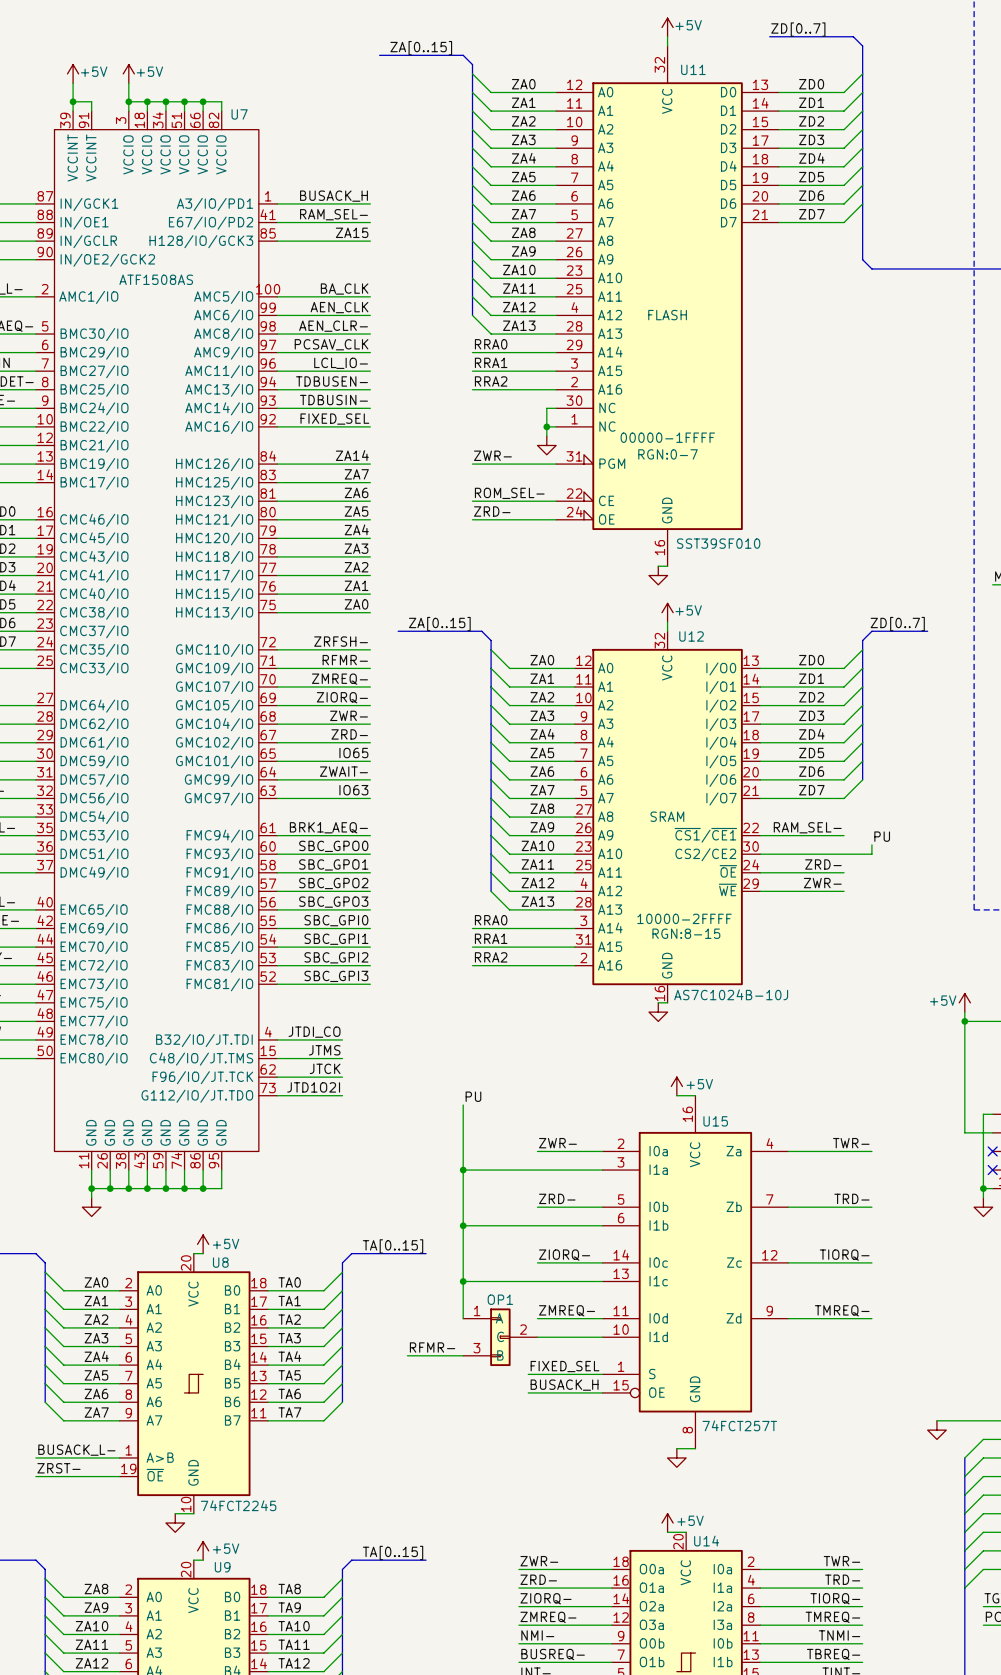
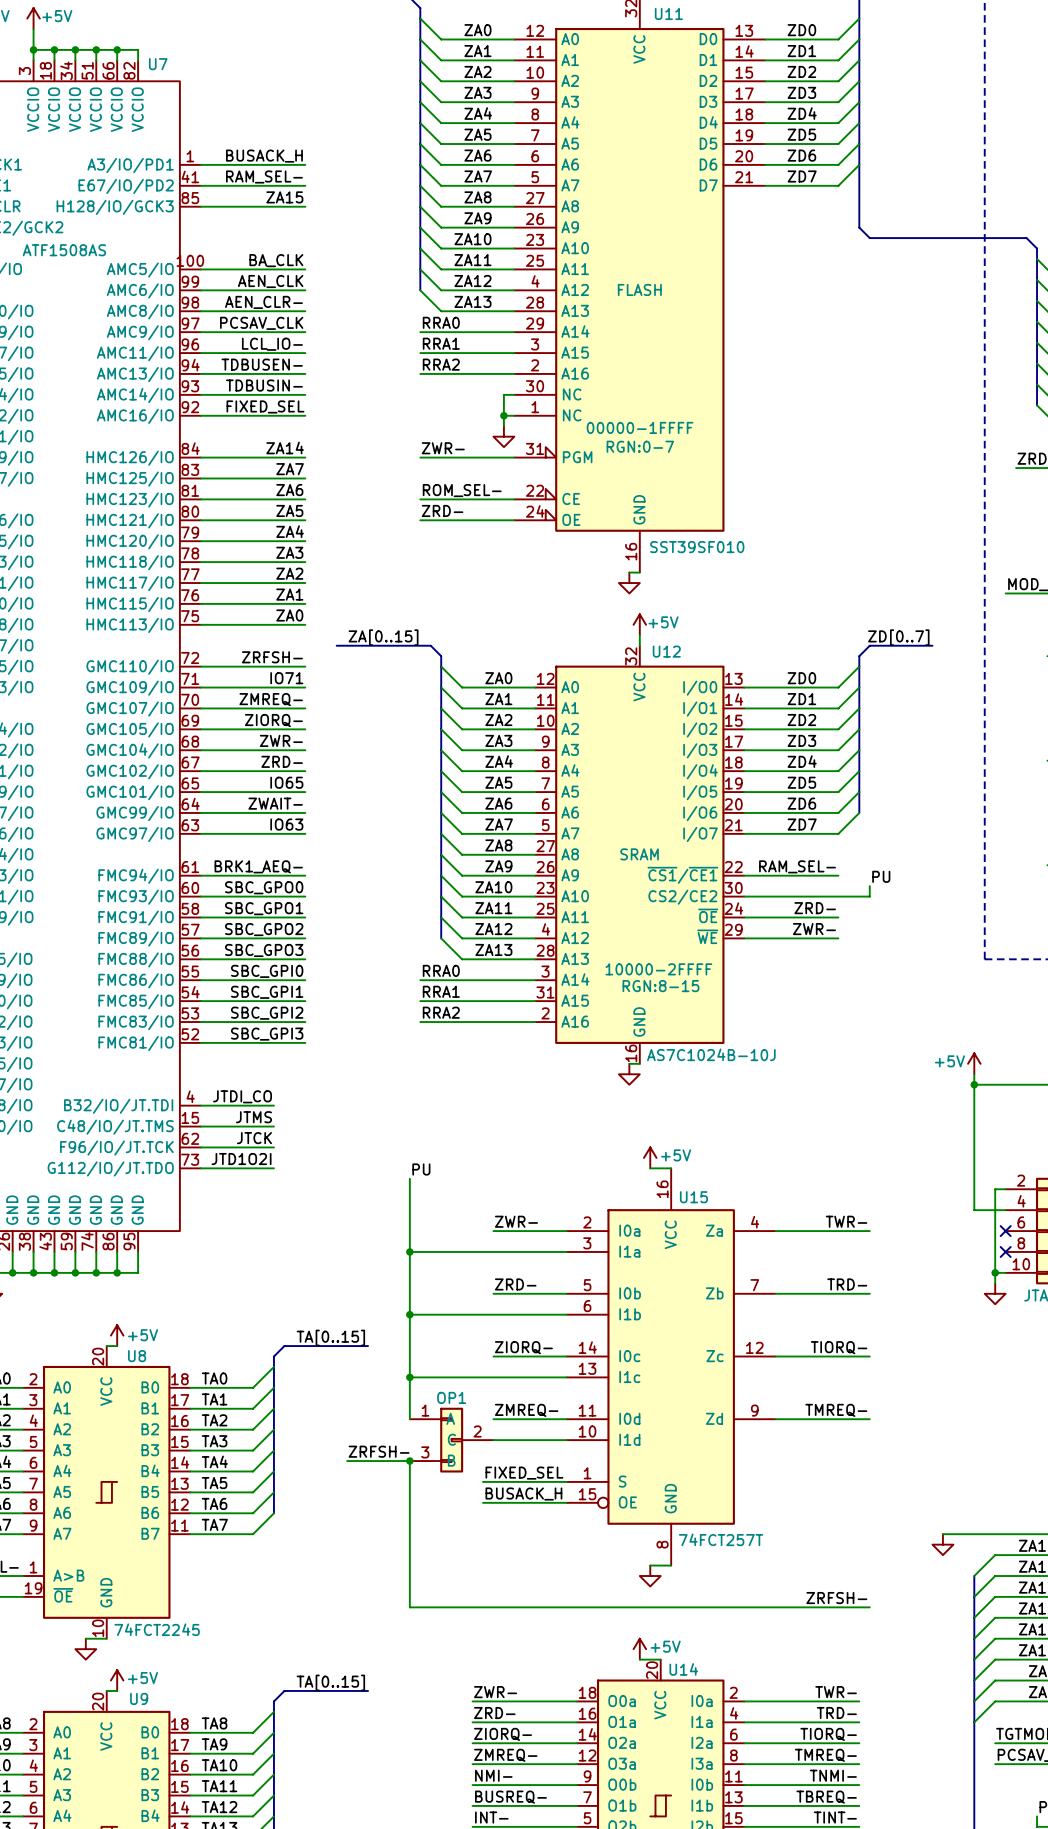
label: RFMR- (345, 660) -> IO71 (286, 678)
label: RFMR- (432, 1347) -> ZRFSH- (379, 1451)
wire: none -> (409, 1461) (409, 1607) (869, 1607)
junction: none -> (409, 1461)
label: none -> ZRFSH- (836, 1598)

